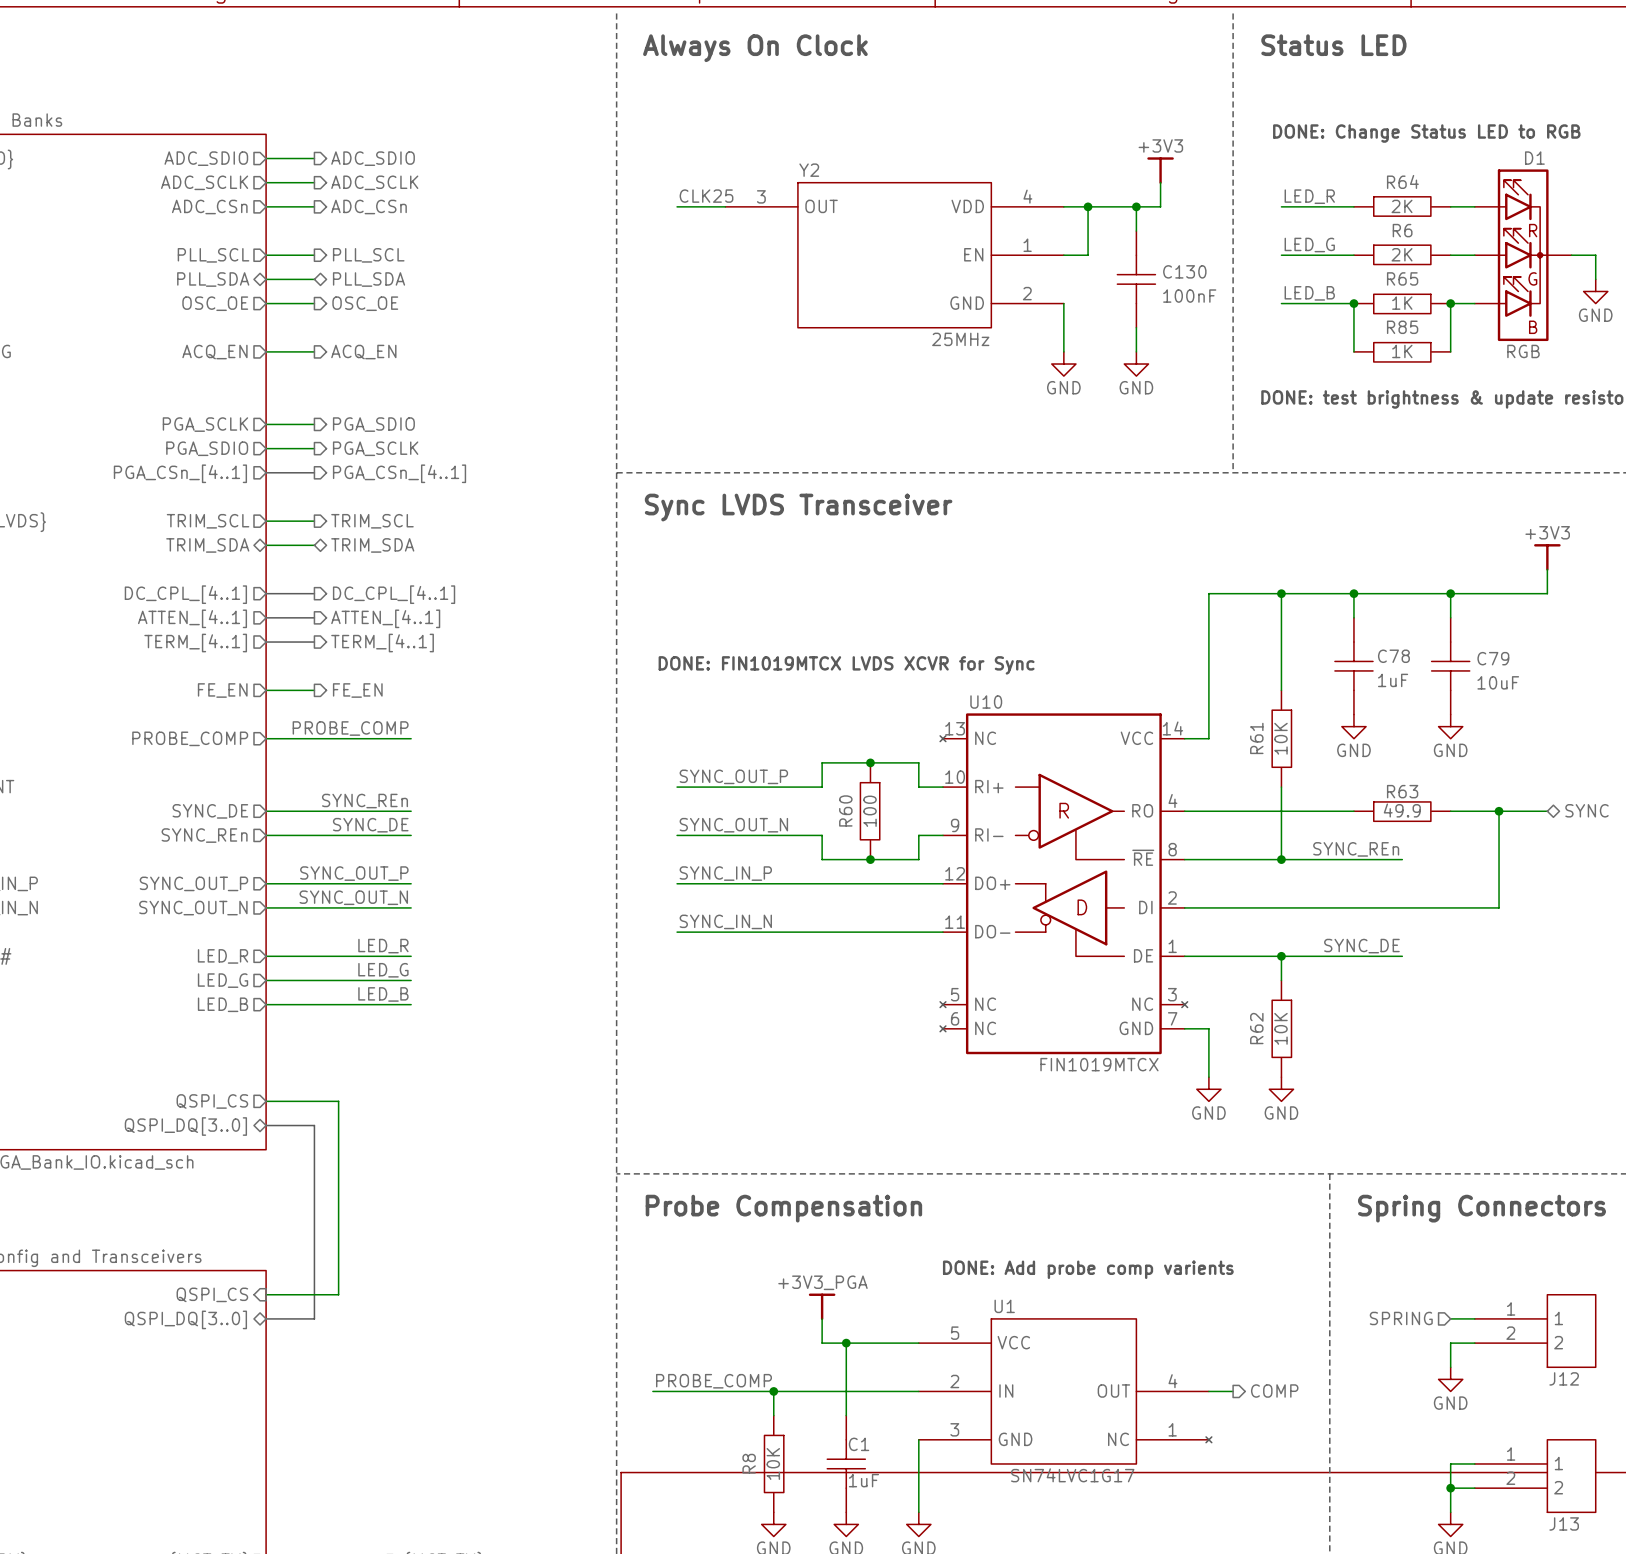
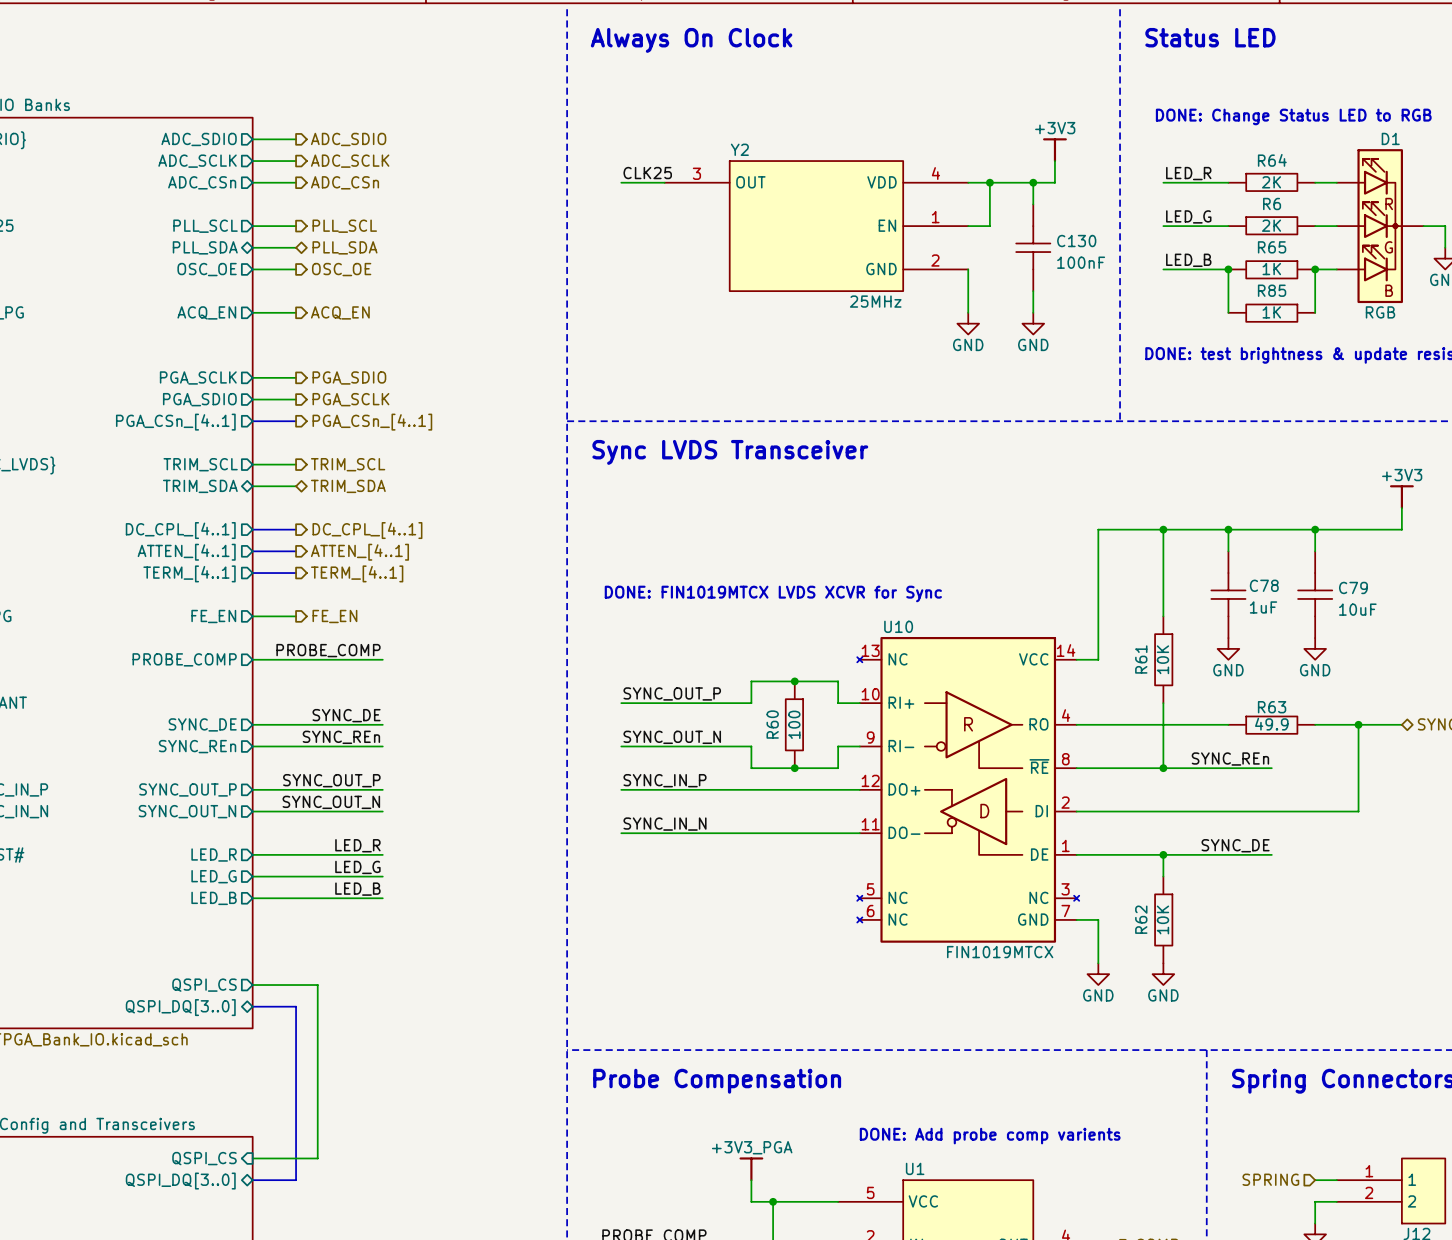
label: SYNC_REn (364, 801) -> SYNC_DE (346, 715)
label: SYNC_DE (370, 825) -> SYNC_REn (341, 737)

